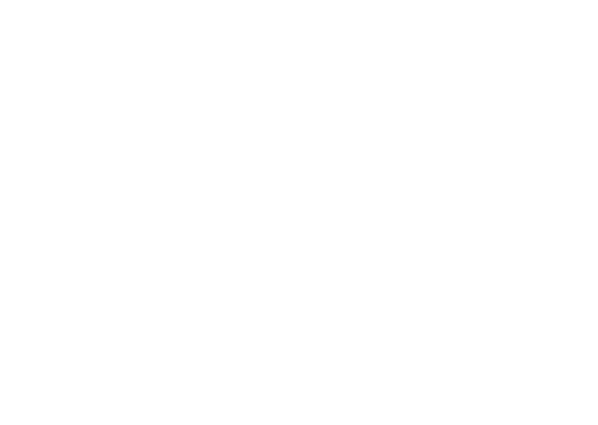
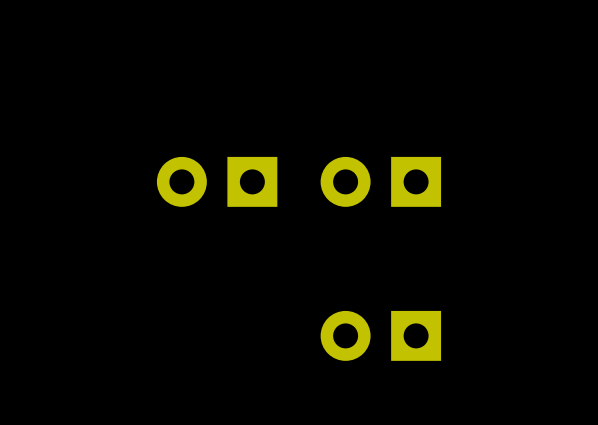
part: none -> (217, 181)
part: none -> (380, 181)
part: none -> (380, 335)

